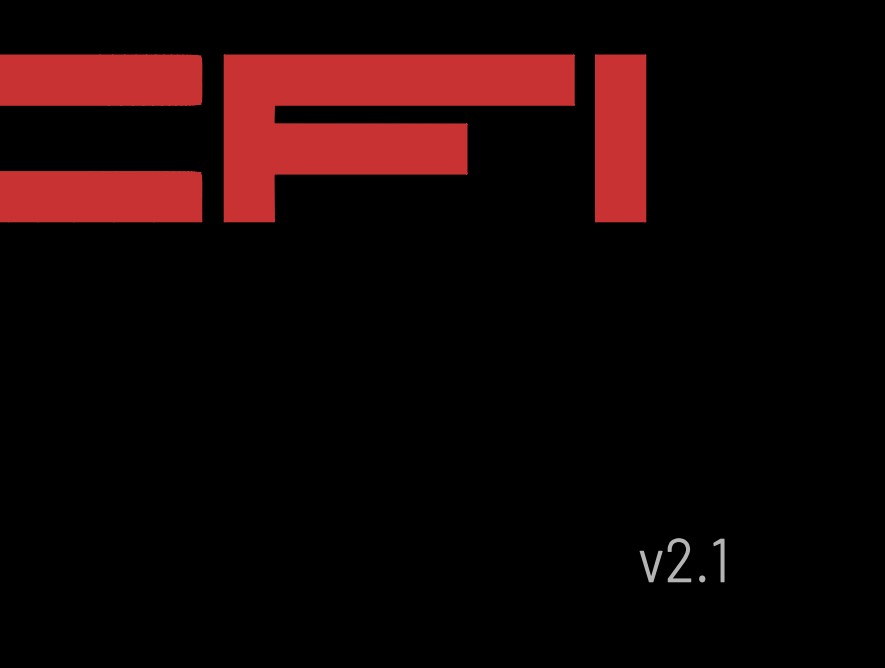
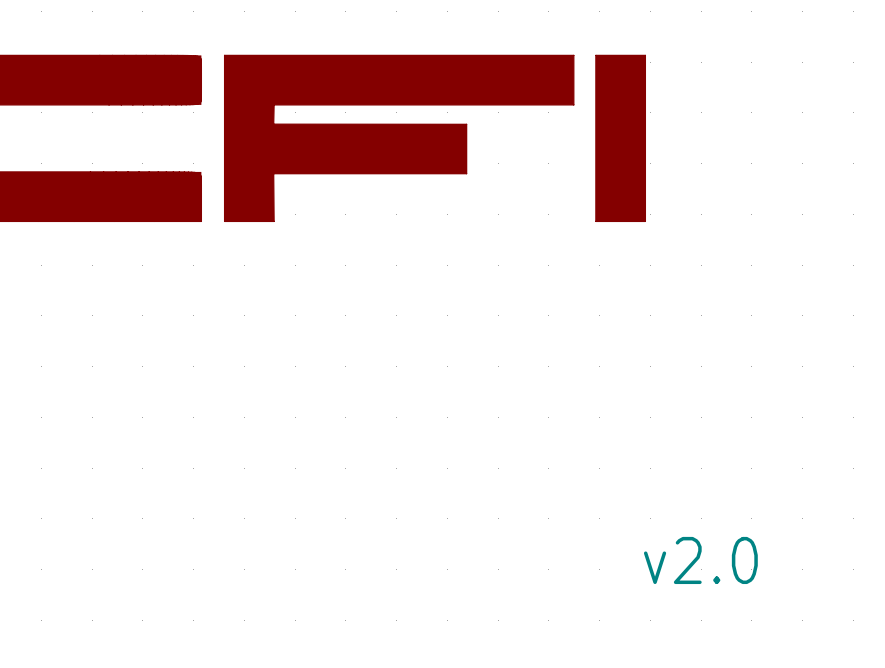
text: v2.1 (682, 560) -> v2.0 (700, 560)

